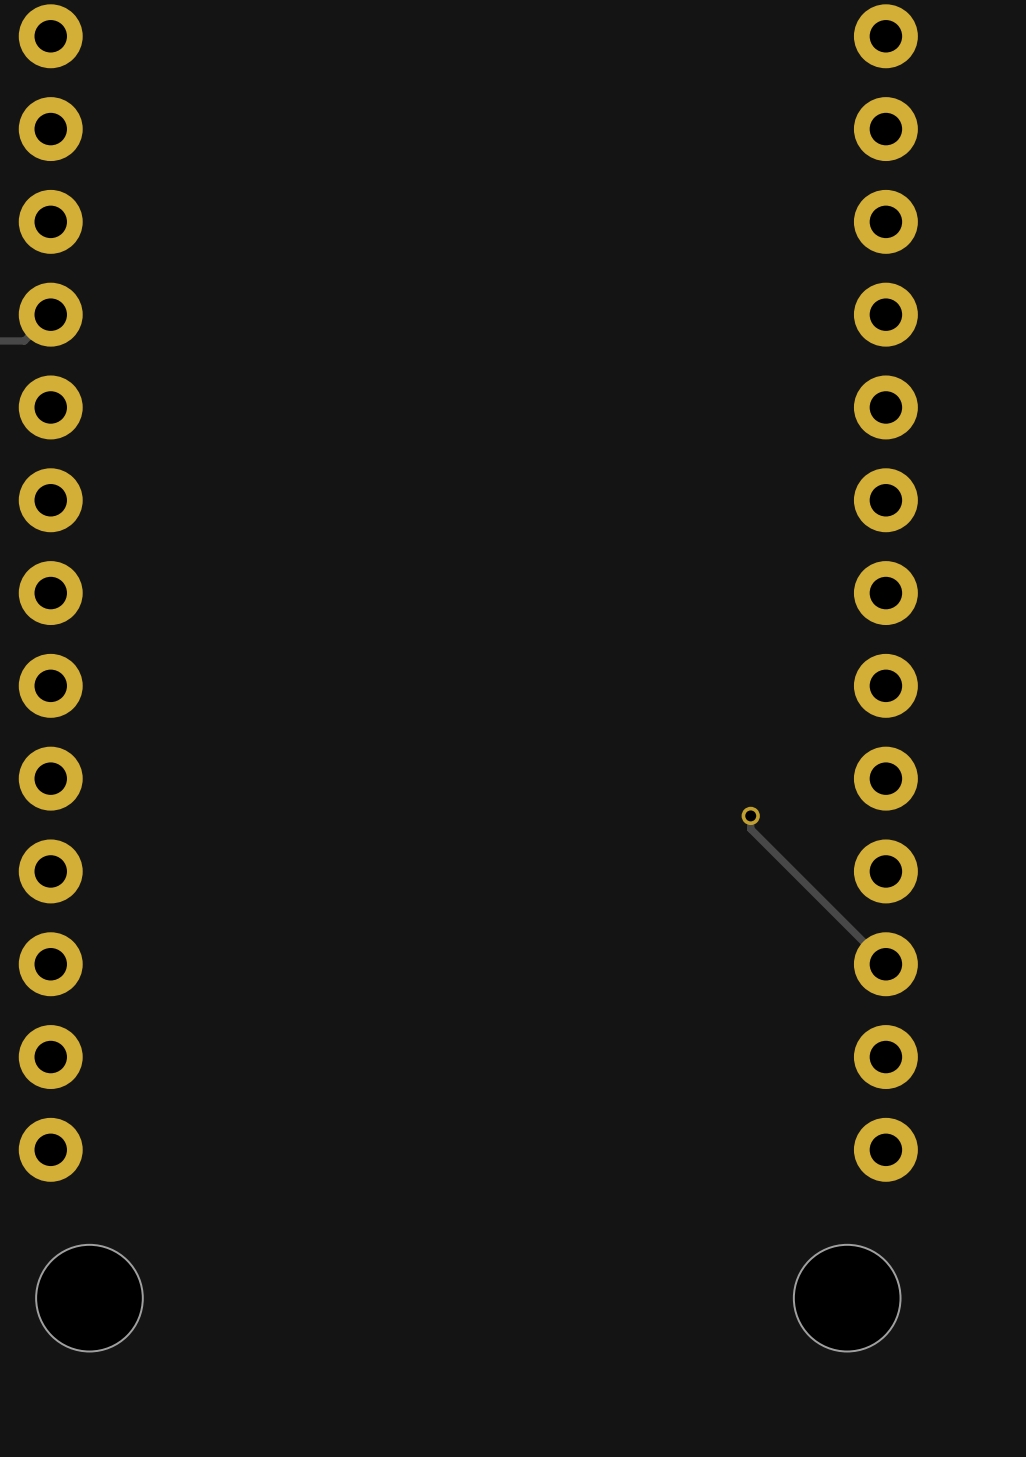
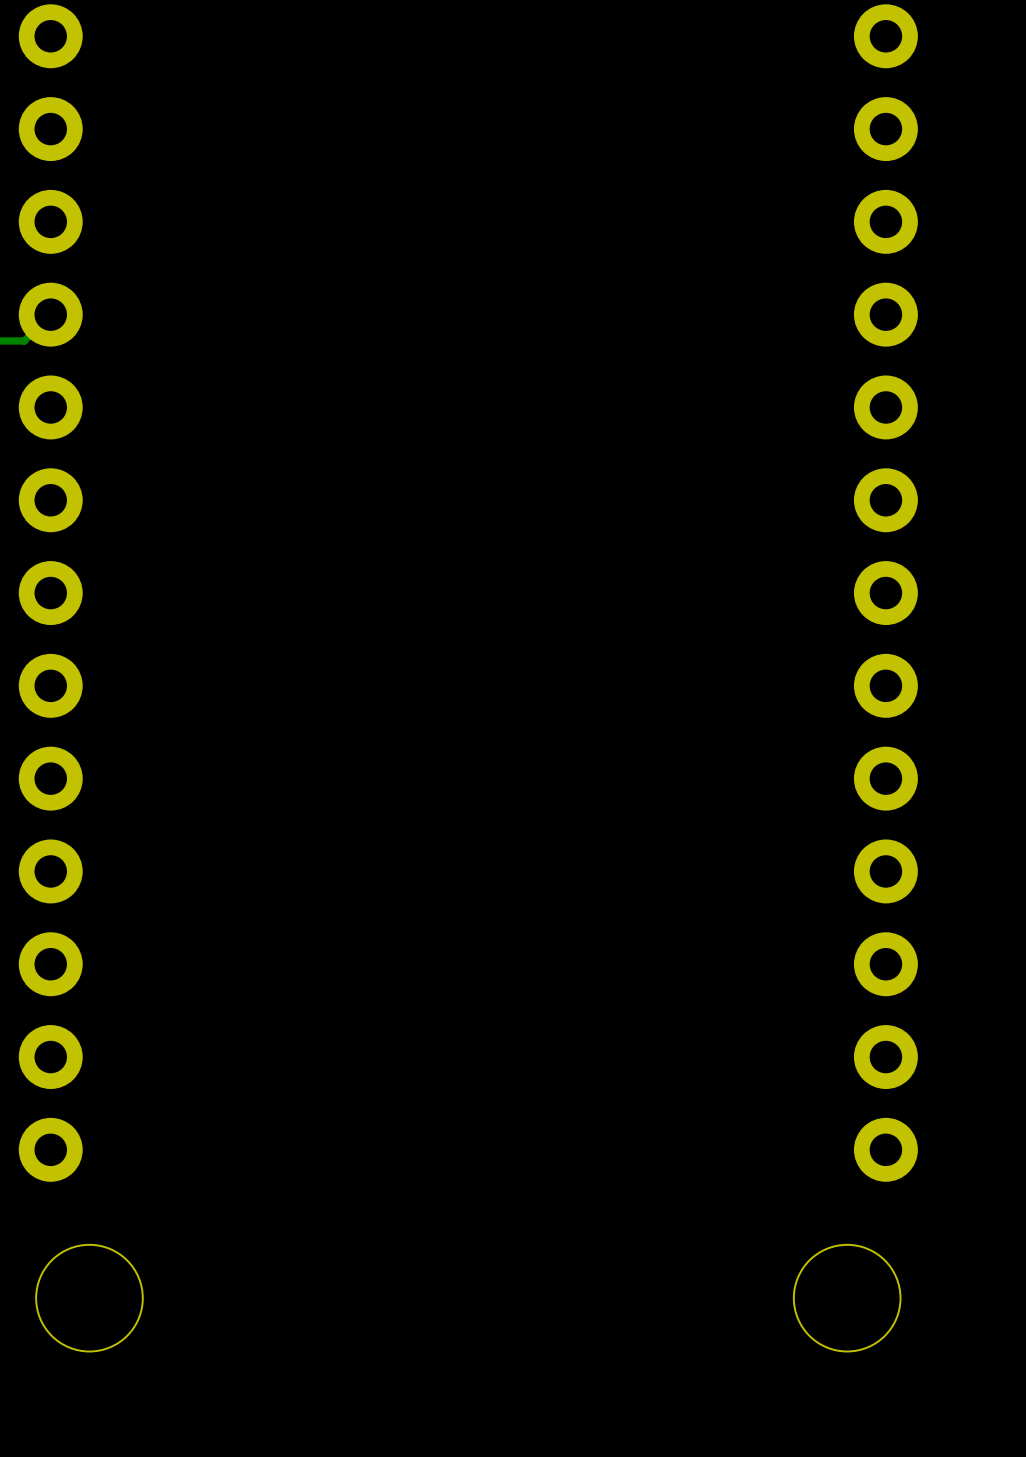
track: (750, 815) (750, 829) (885, 964) -> none
via: (750, 815) -> none

